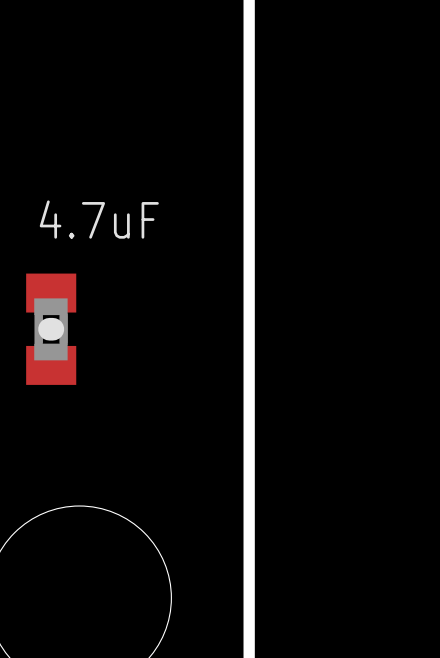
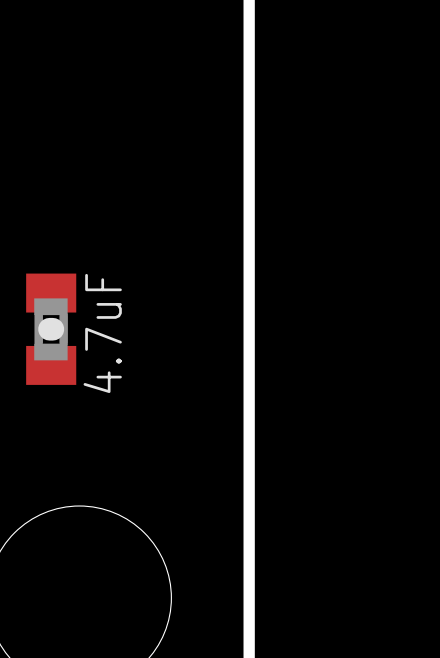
part value rotation: 0° (99, 219) -> 90° counterclockwise (102, 333)

